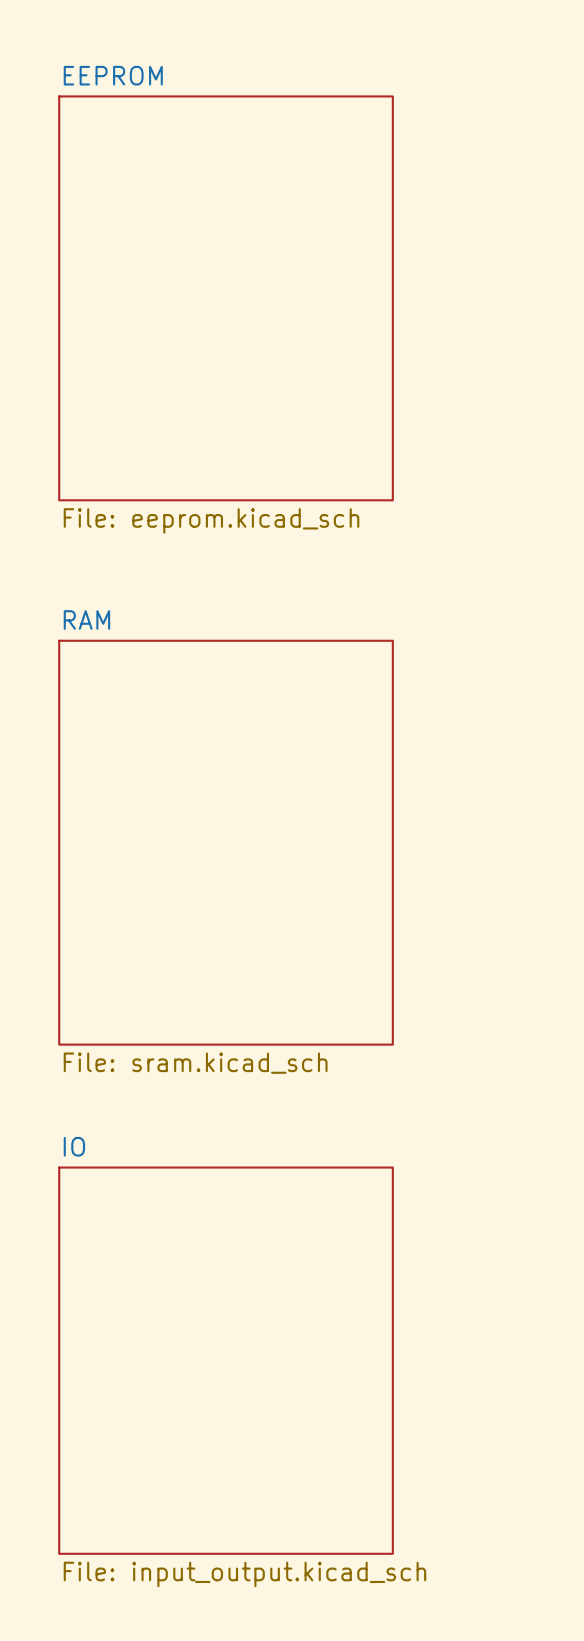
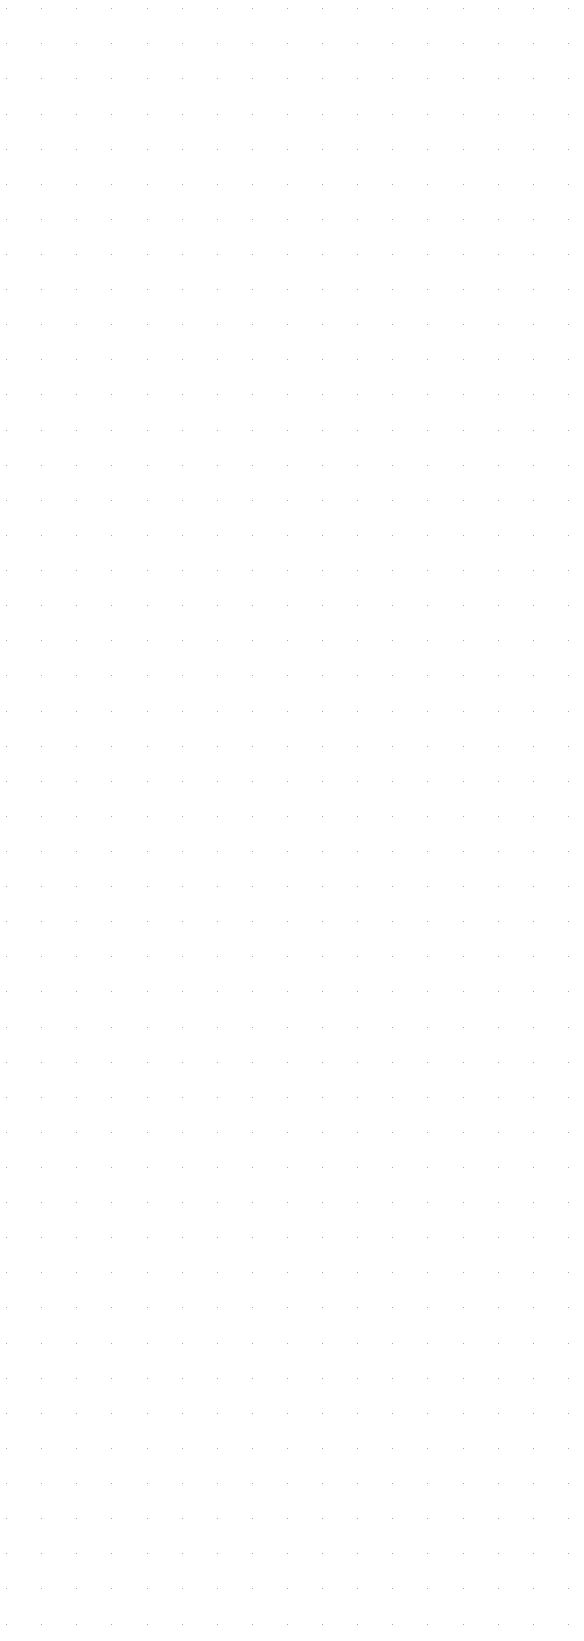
sheet EEPROM: File: eeprom.kicad_sch (226, 298) -> none
sheet RAM: File: sram.kicad_sch (226, 842) -> none
sheet IO: File: input_output.kicad_sch (226, 1360) -> none

